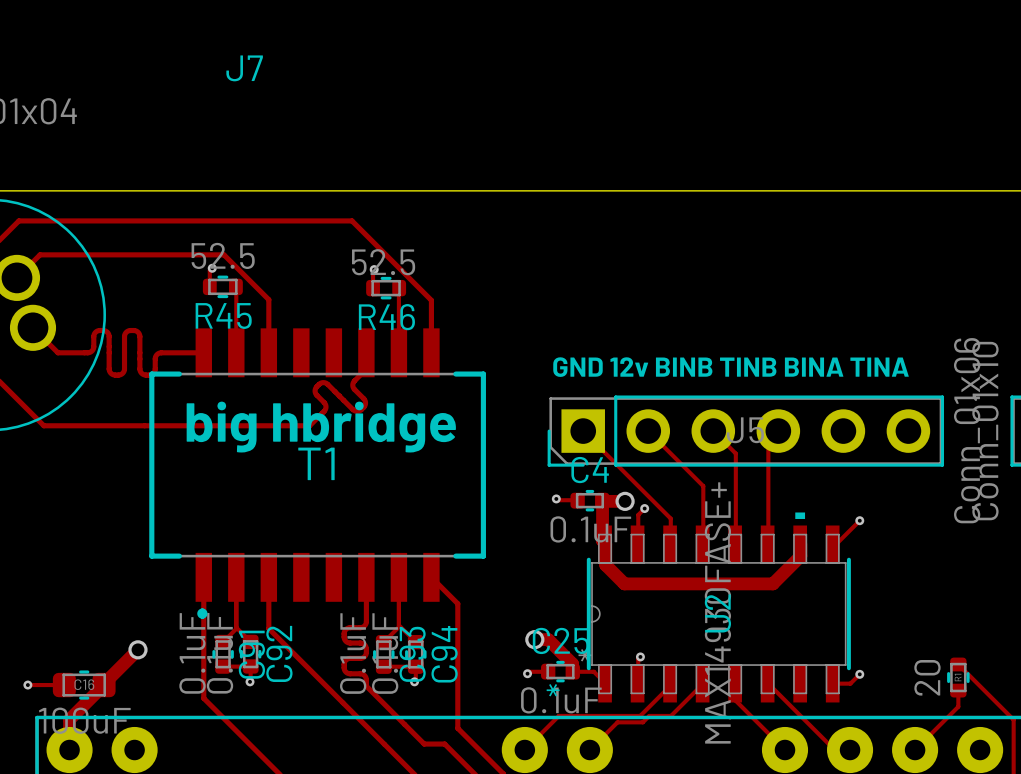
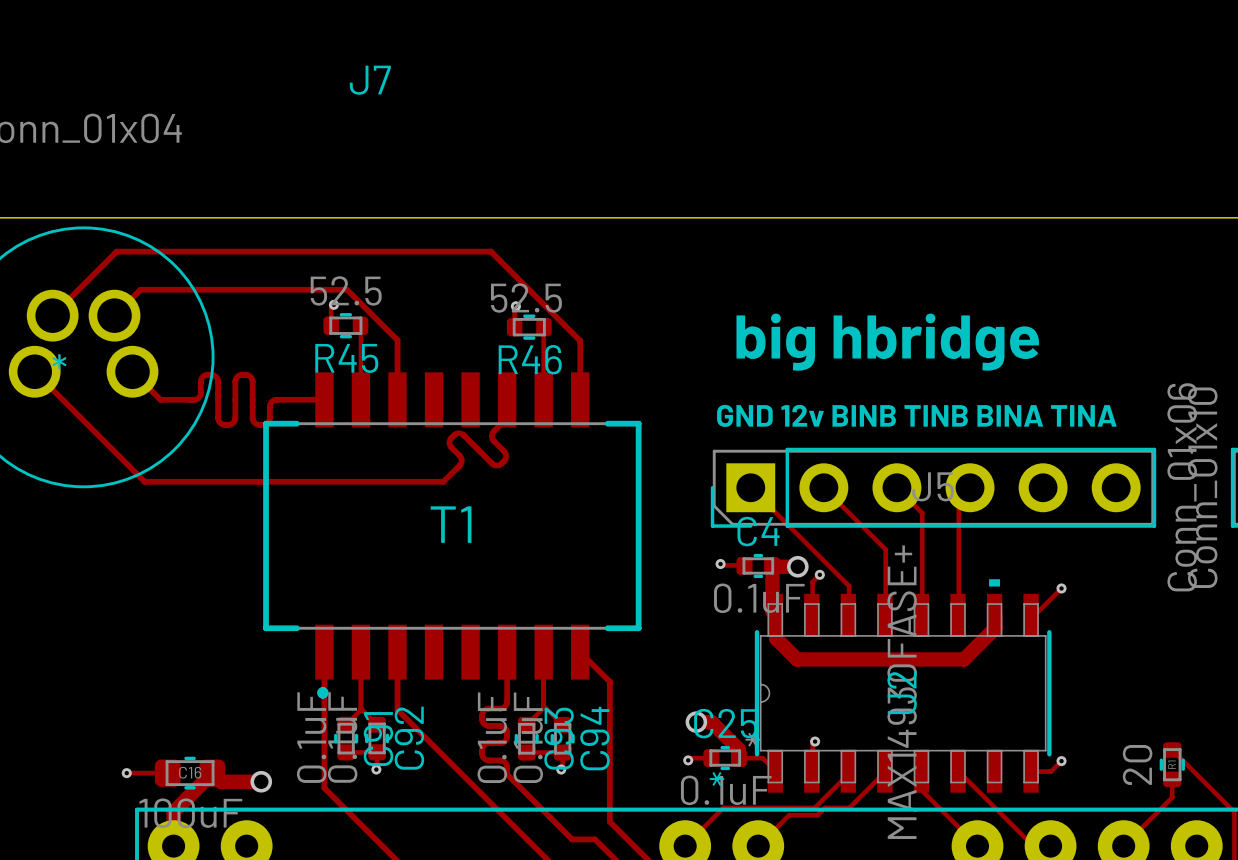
text position: big hbridge (321, 427) -> big hbridge (887, 342)
top track: (137, 649) (104, 685) -> (261, 781) (220, 781) (212, 773)
via position: (137, 649) -> (261, 781)

